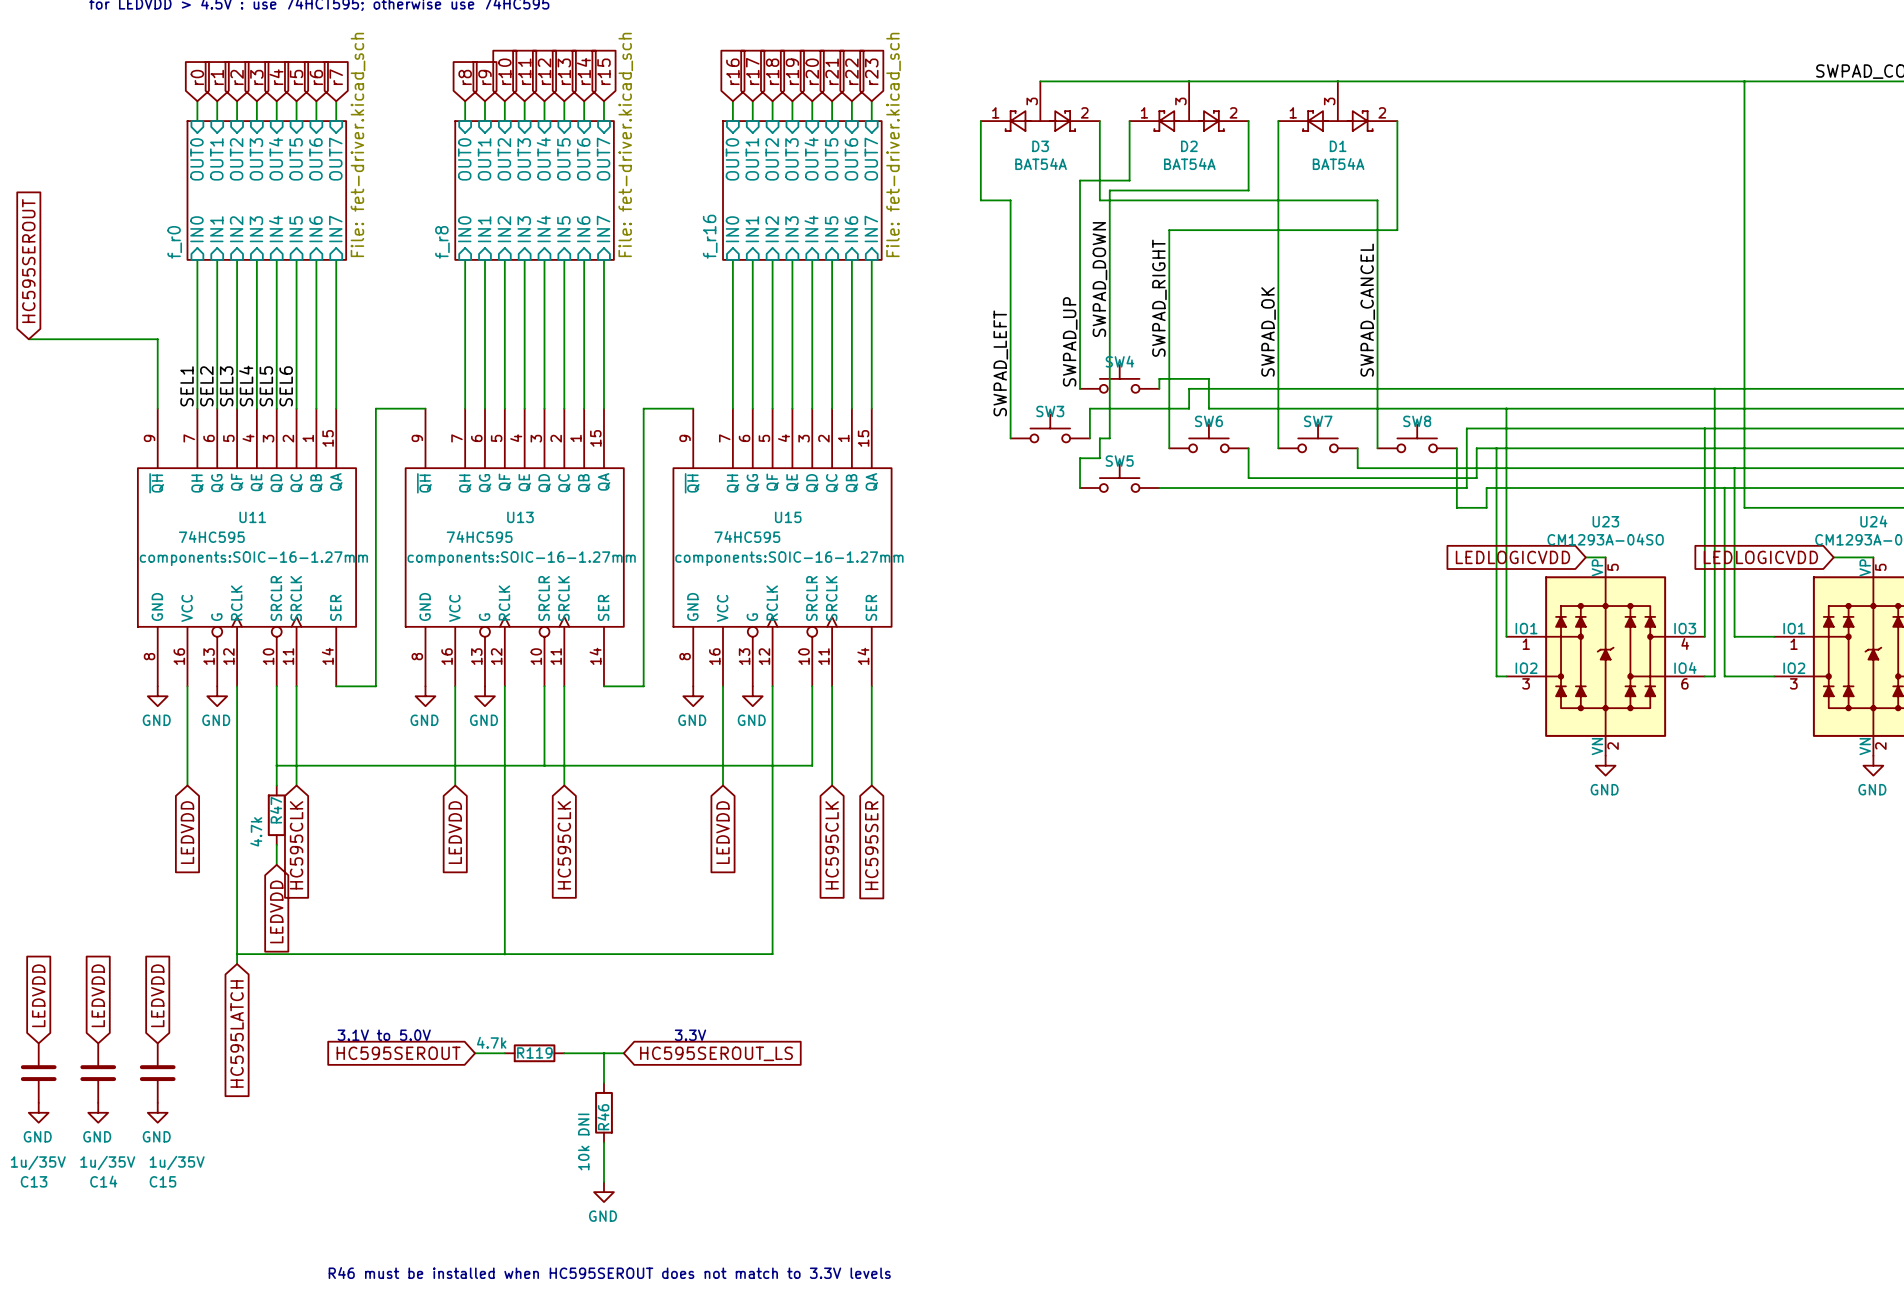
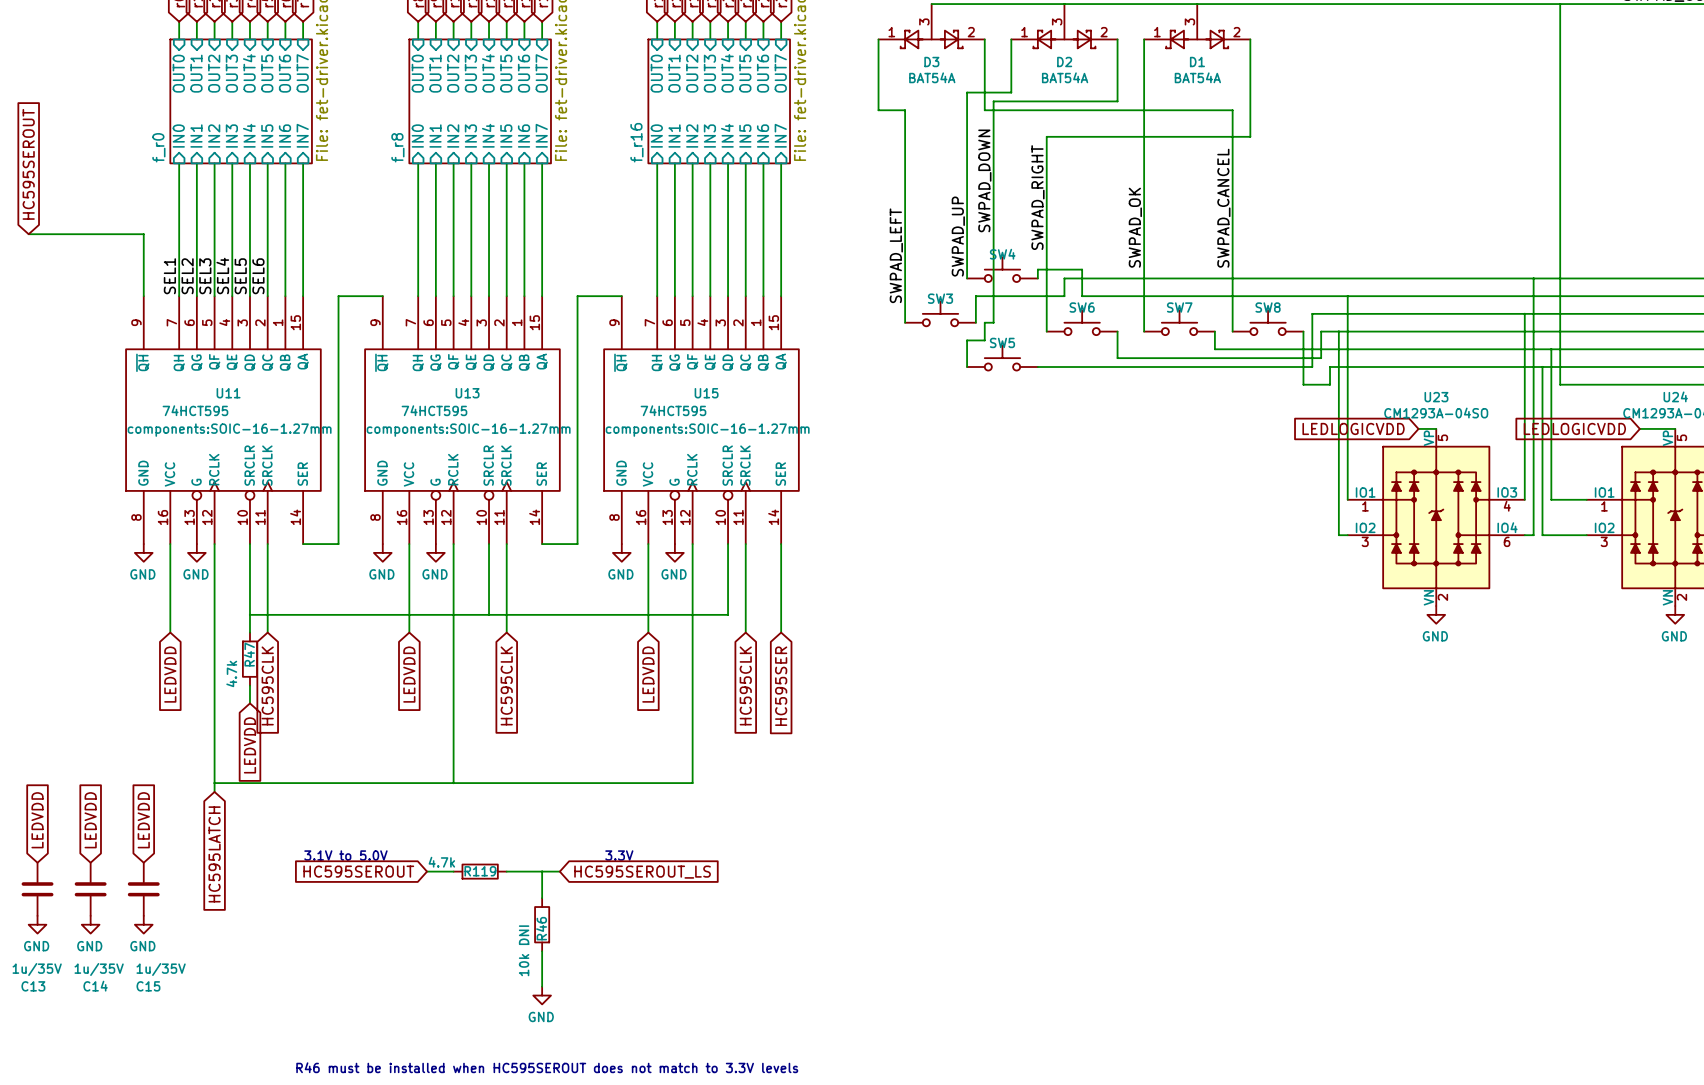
U11 value: 74HC595 (211, 536) -> 74HCT595 (195, 410)
U13 value: 74HC595 (479, 536) -> 74HCT595 (434, 410)
U15 value: 74HC595 (747, 536) -> 74HCT595 (673, 410)

